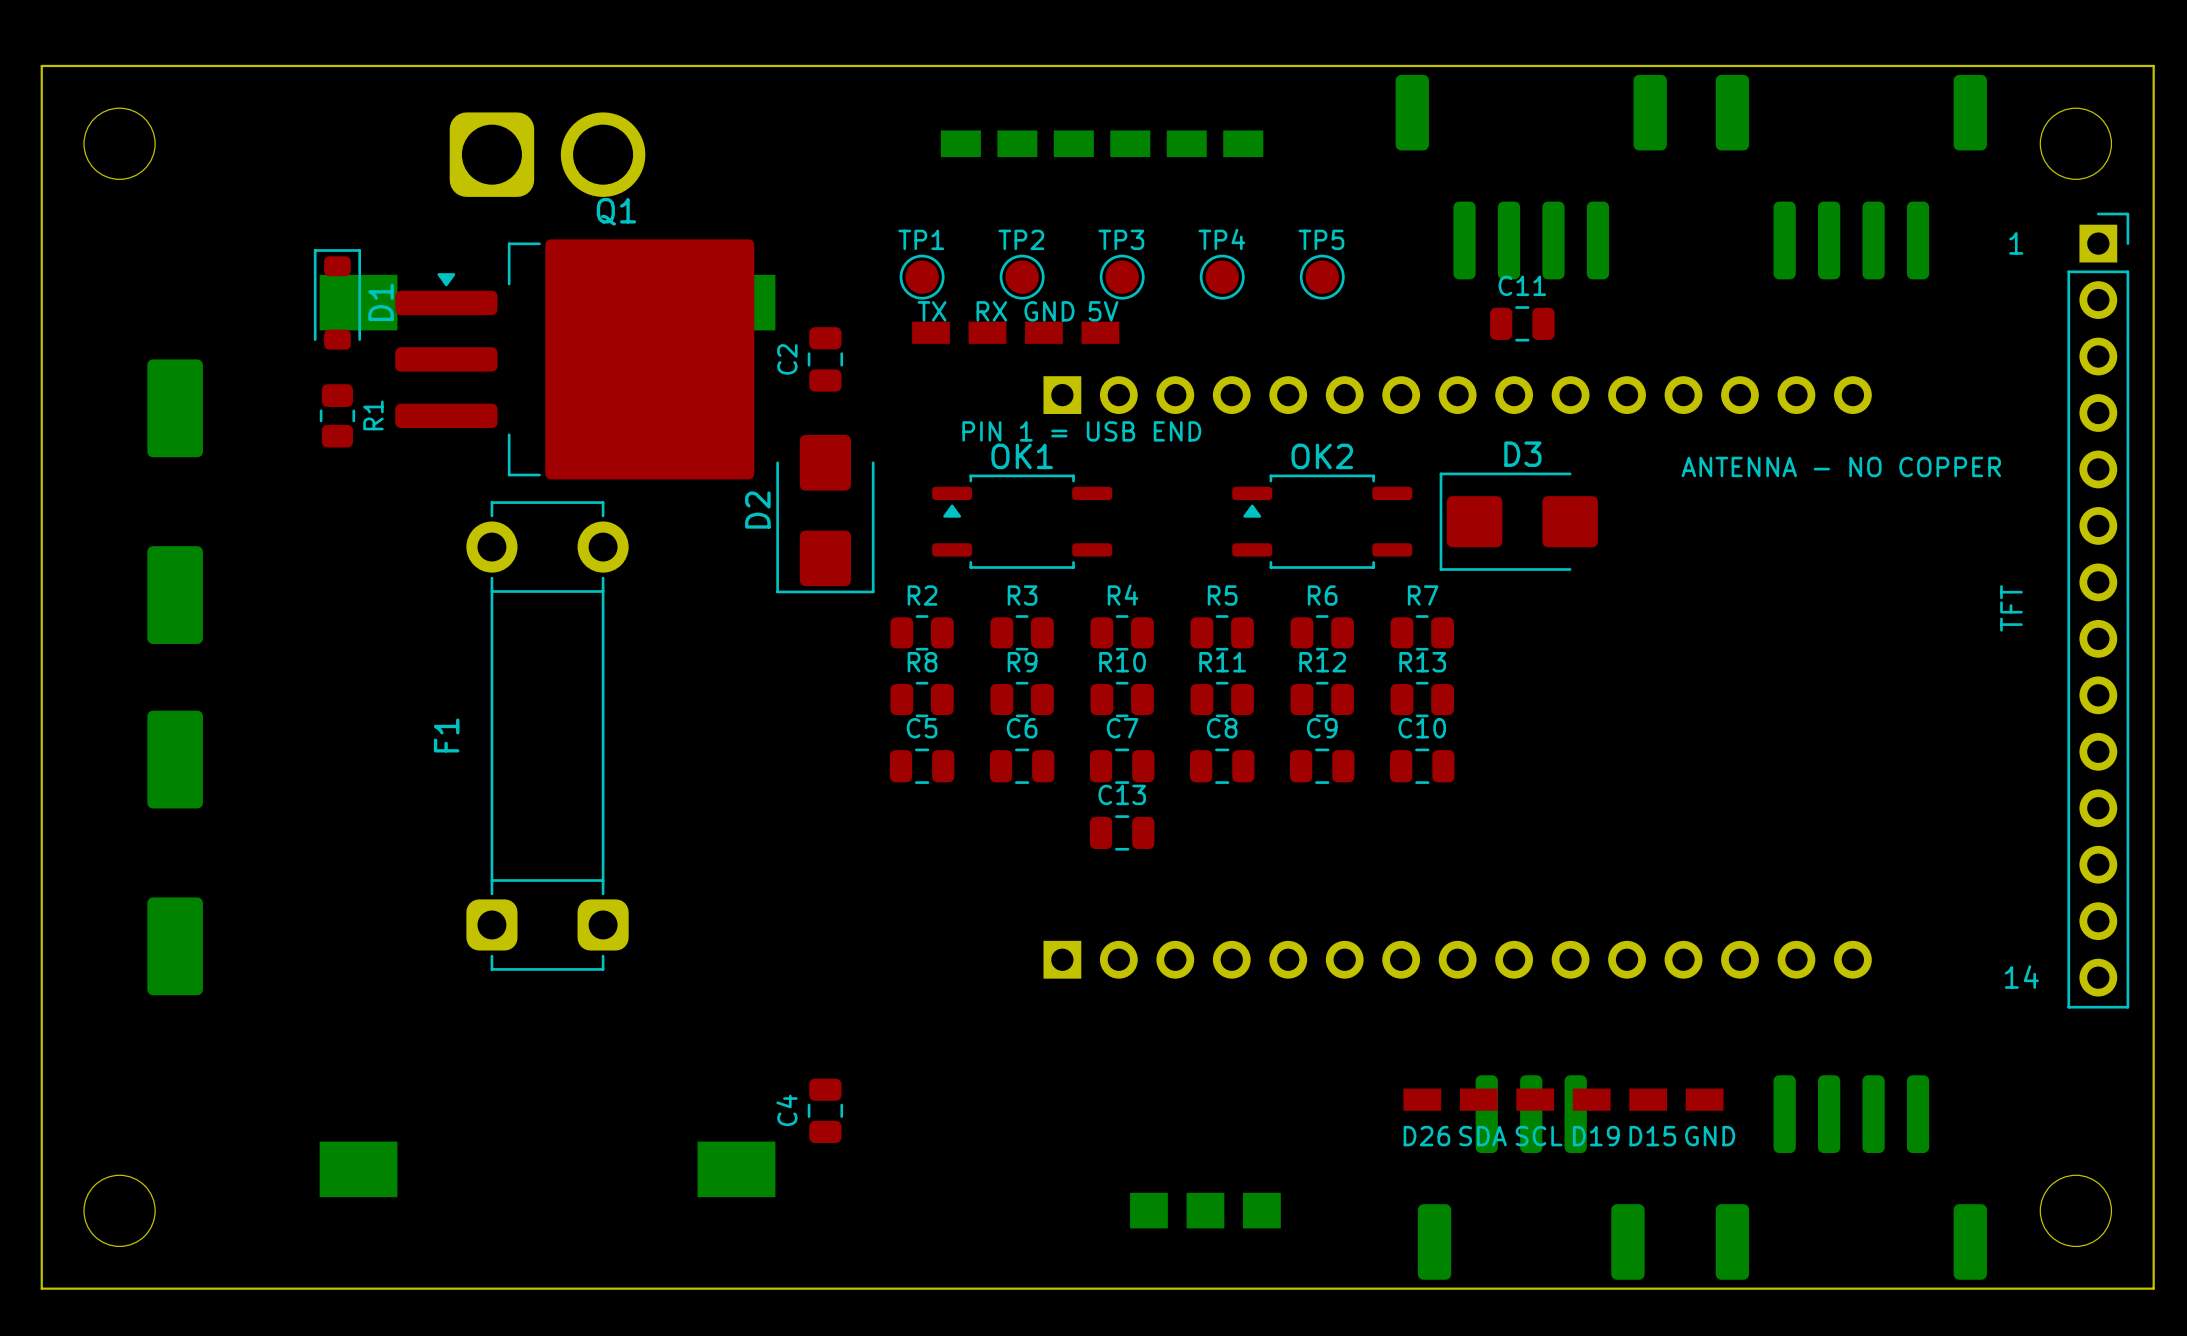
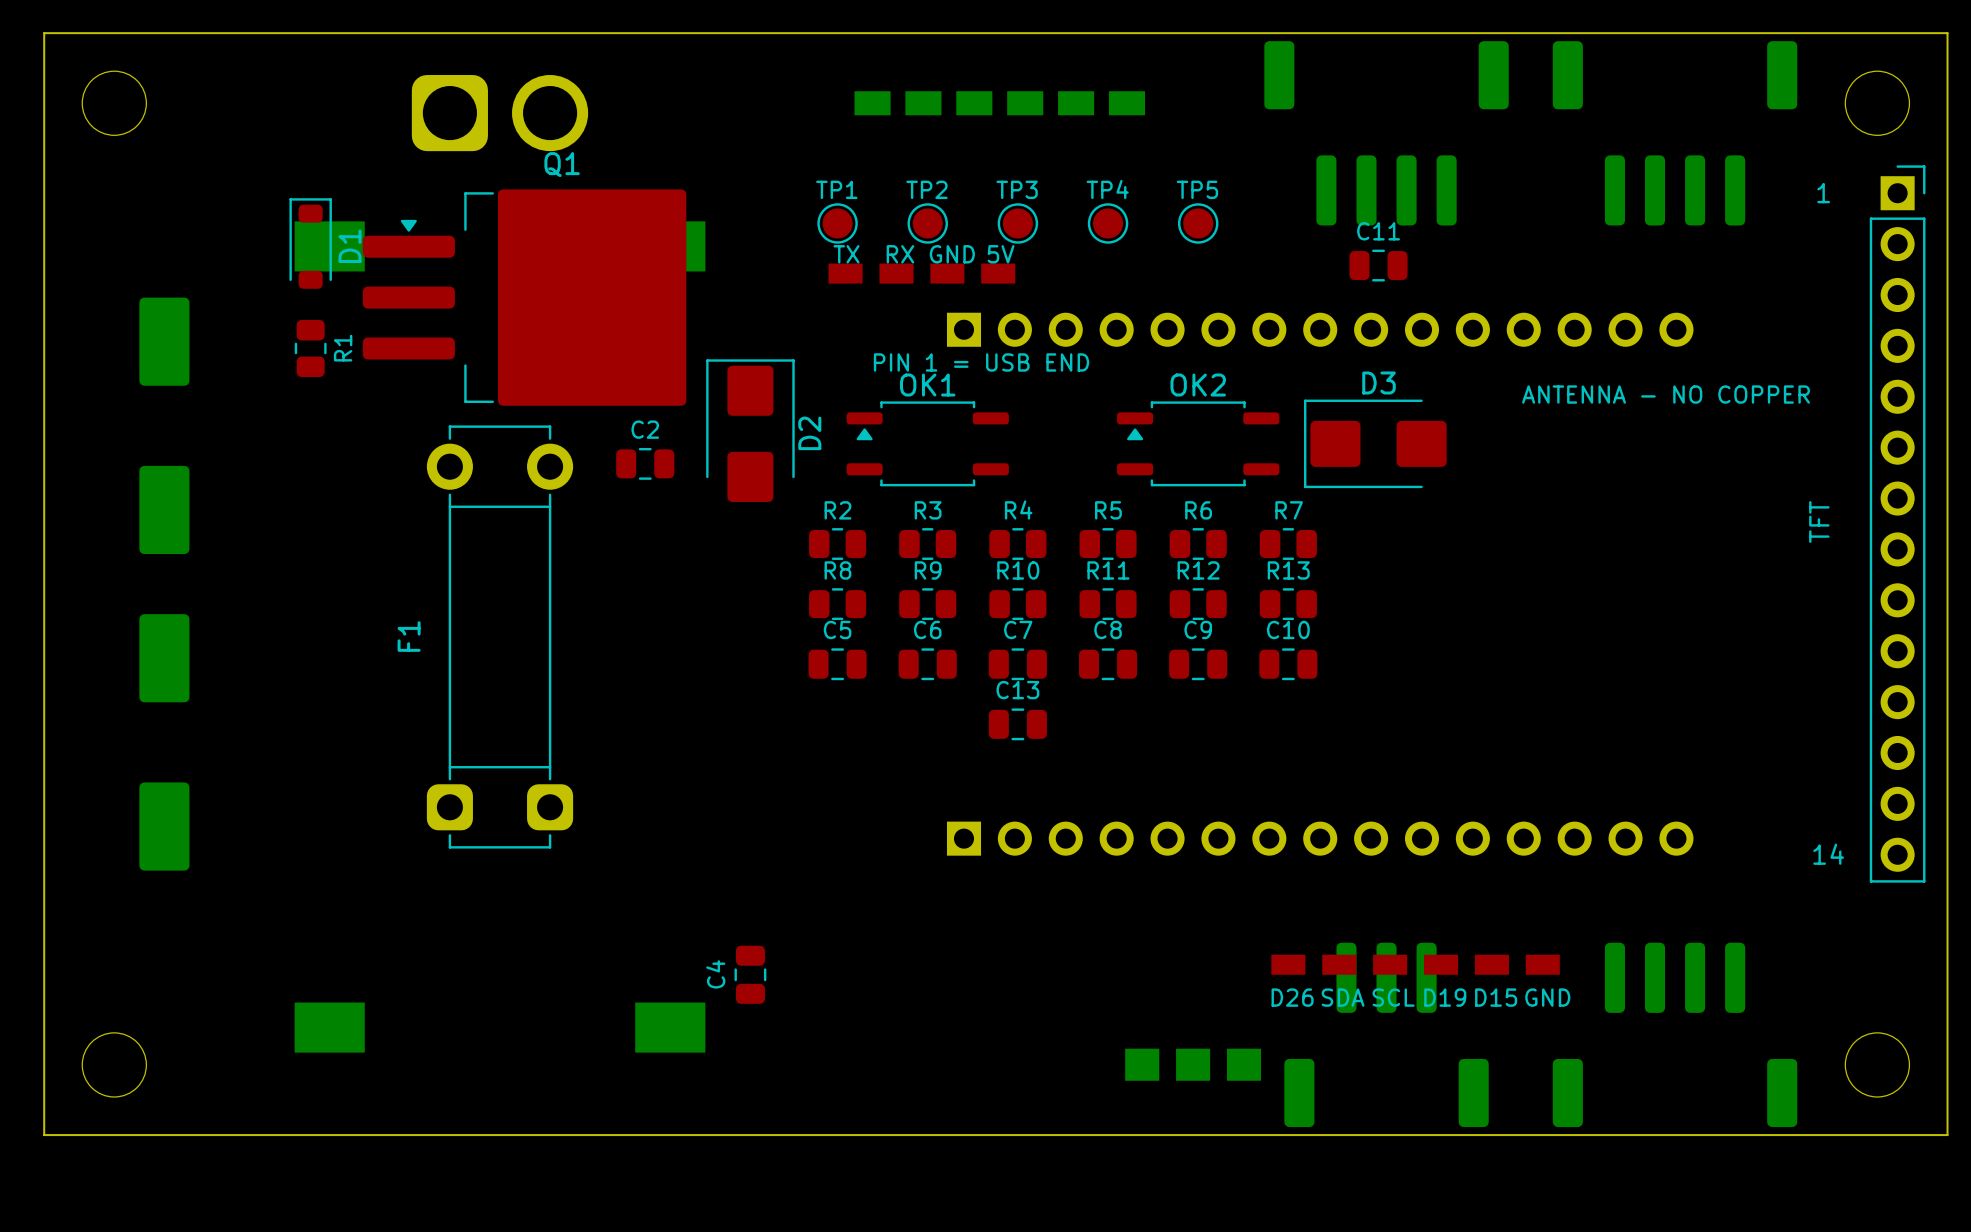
C2 rotation: 0° (825, 359) -> 90° clockwise (645, 463)
C2 position: (825, 359) -> (645, 463)
D2 rotation: 0° (825, 514) -> 180° (750, 430)
part position: (1205, 1210) -> (1193, 1064)

